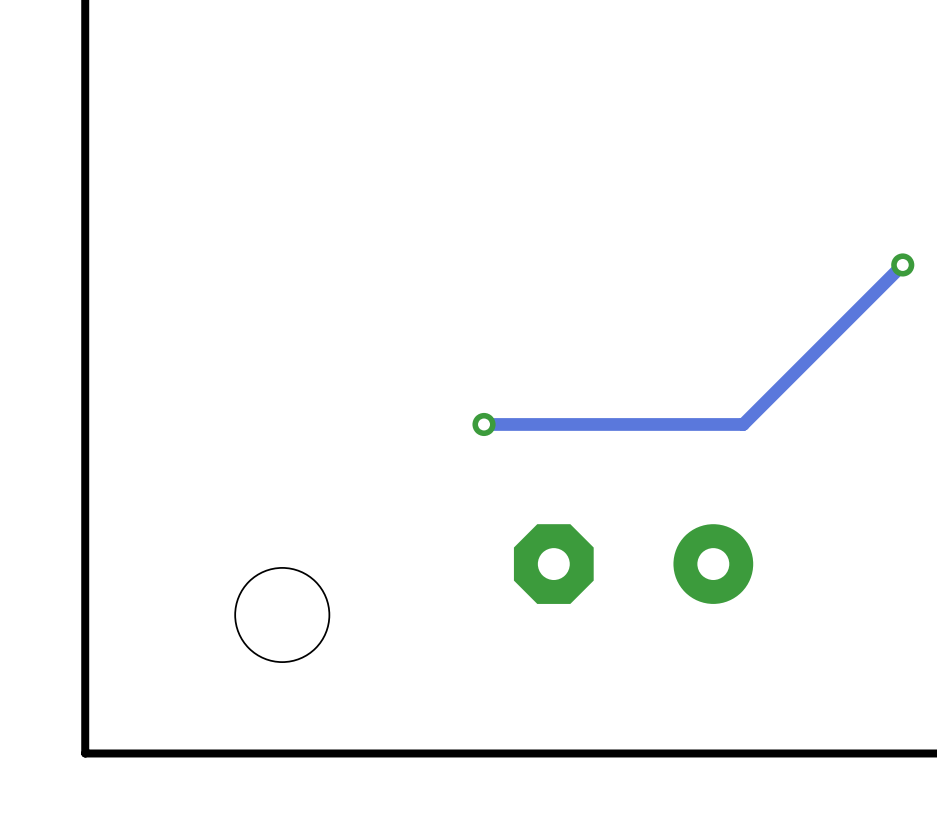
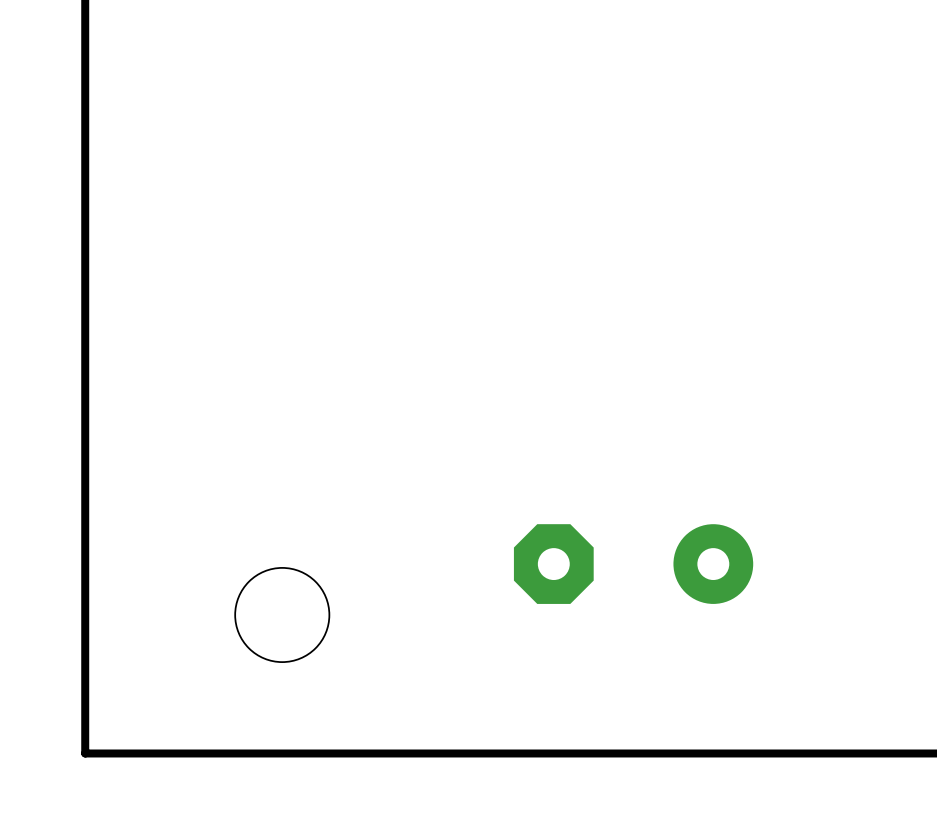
track: (902, 264) (743, 424) (484, 424) -> none
via: (902, 264) -> none
via: (484, 424) -> none

